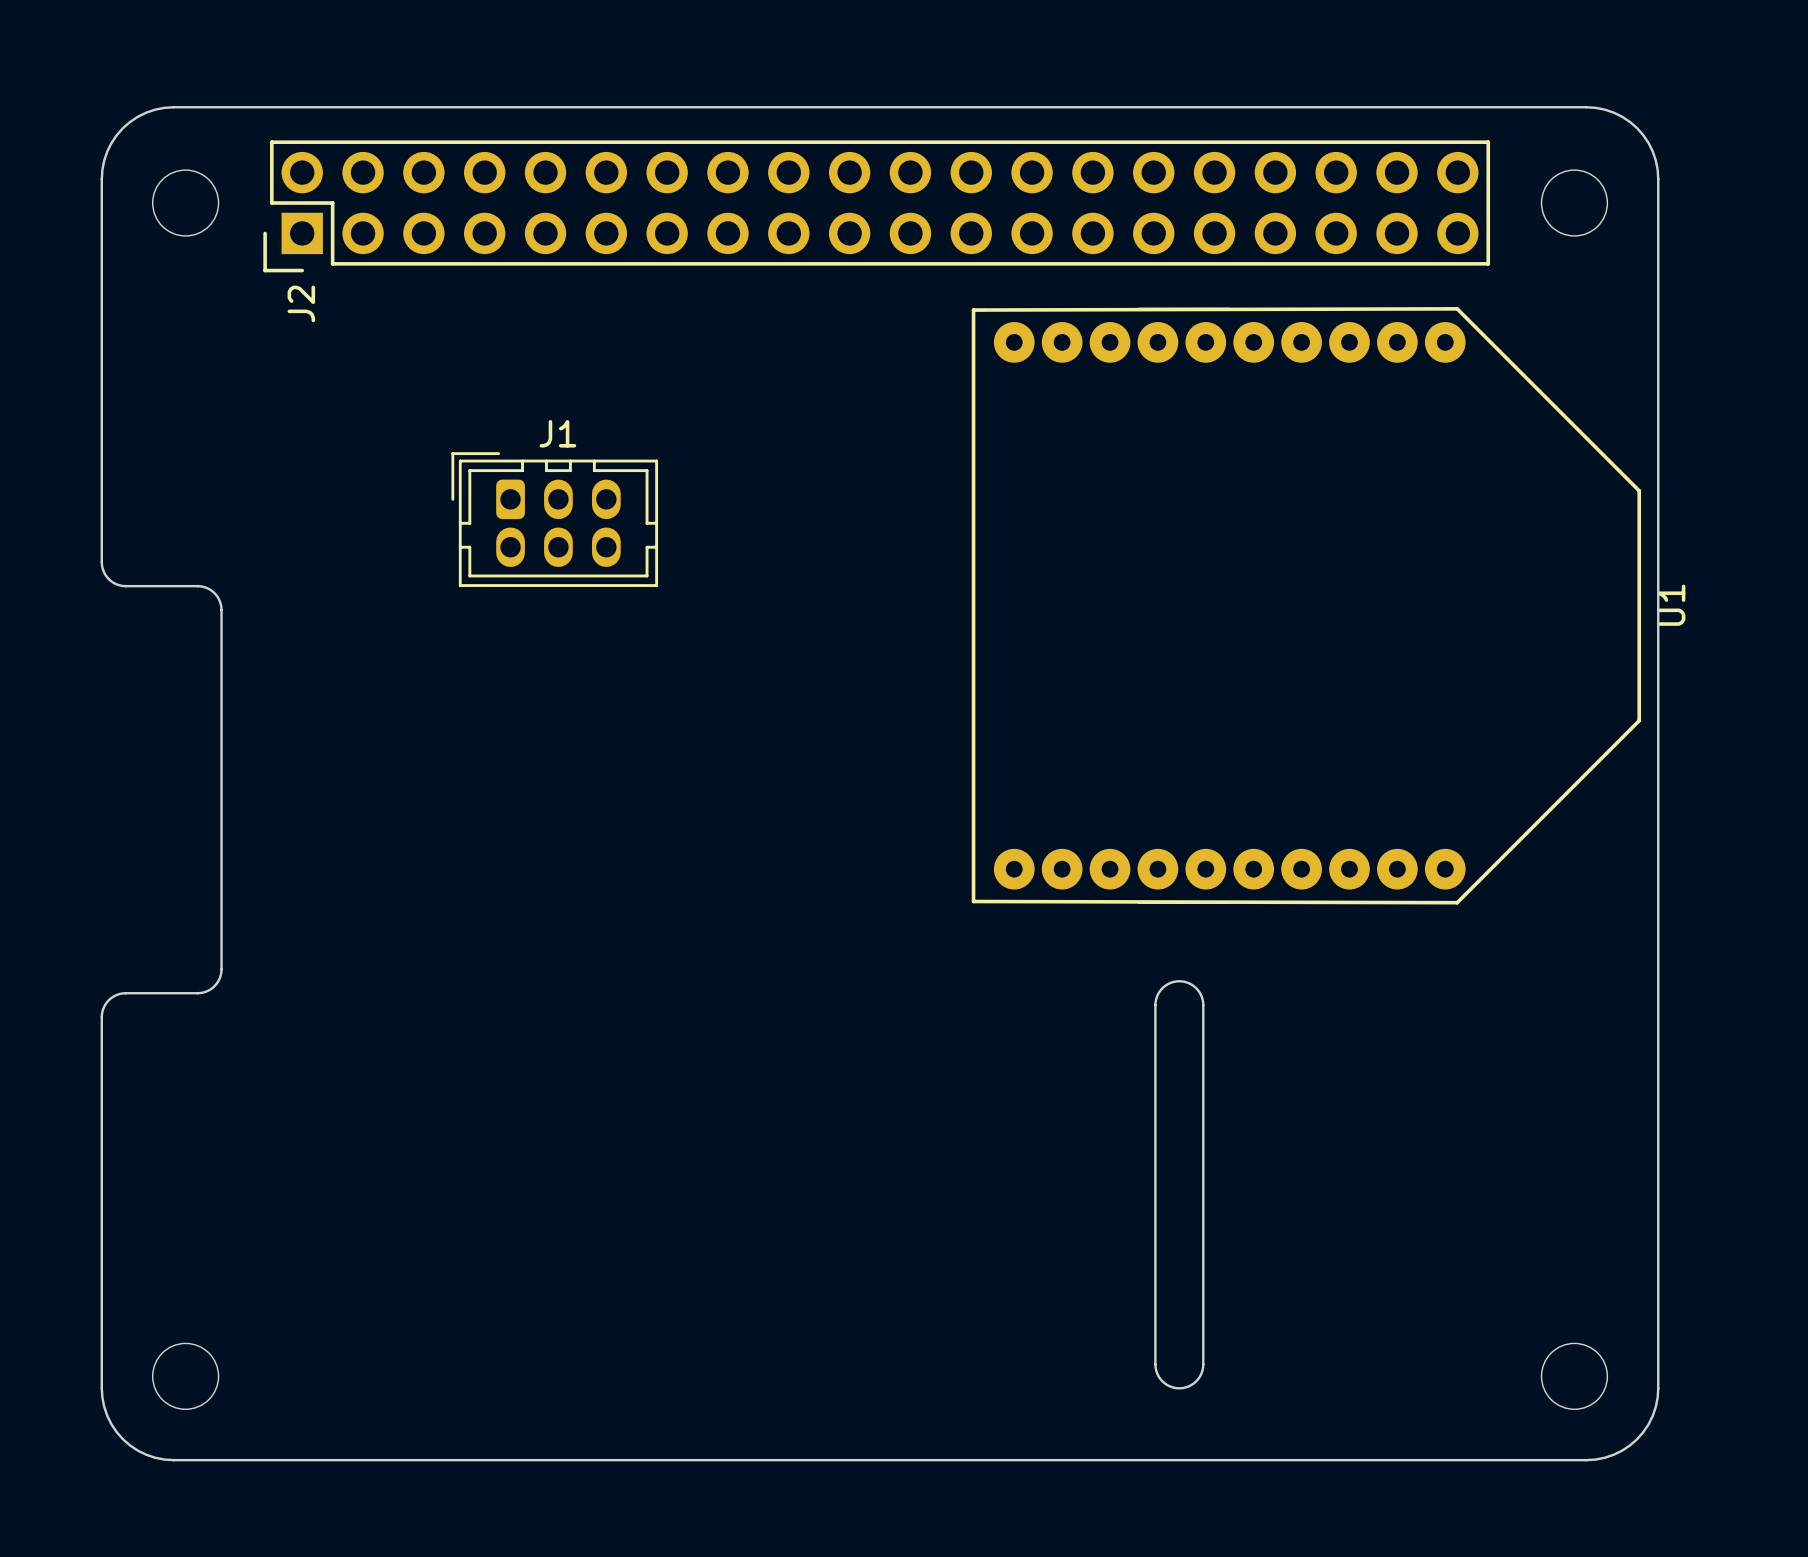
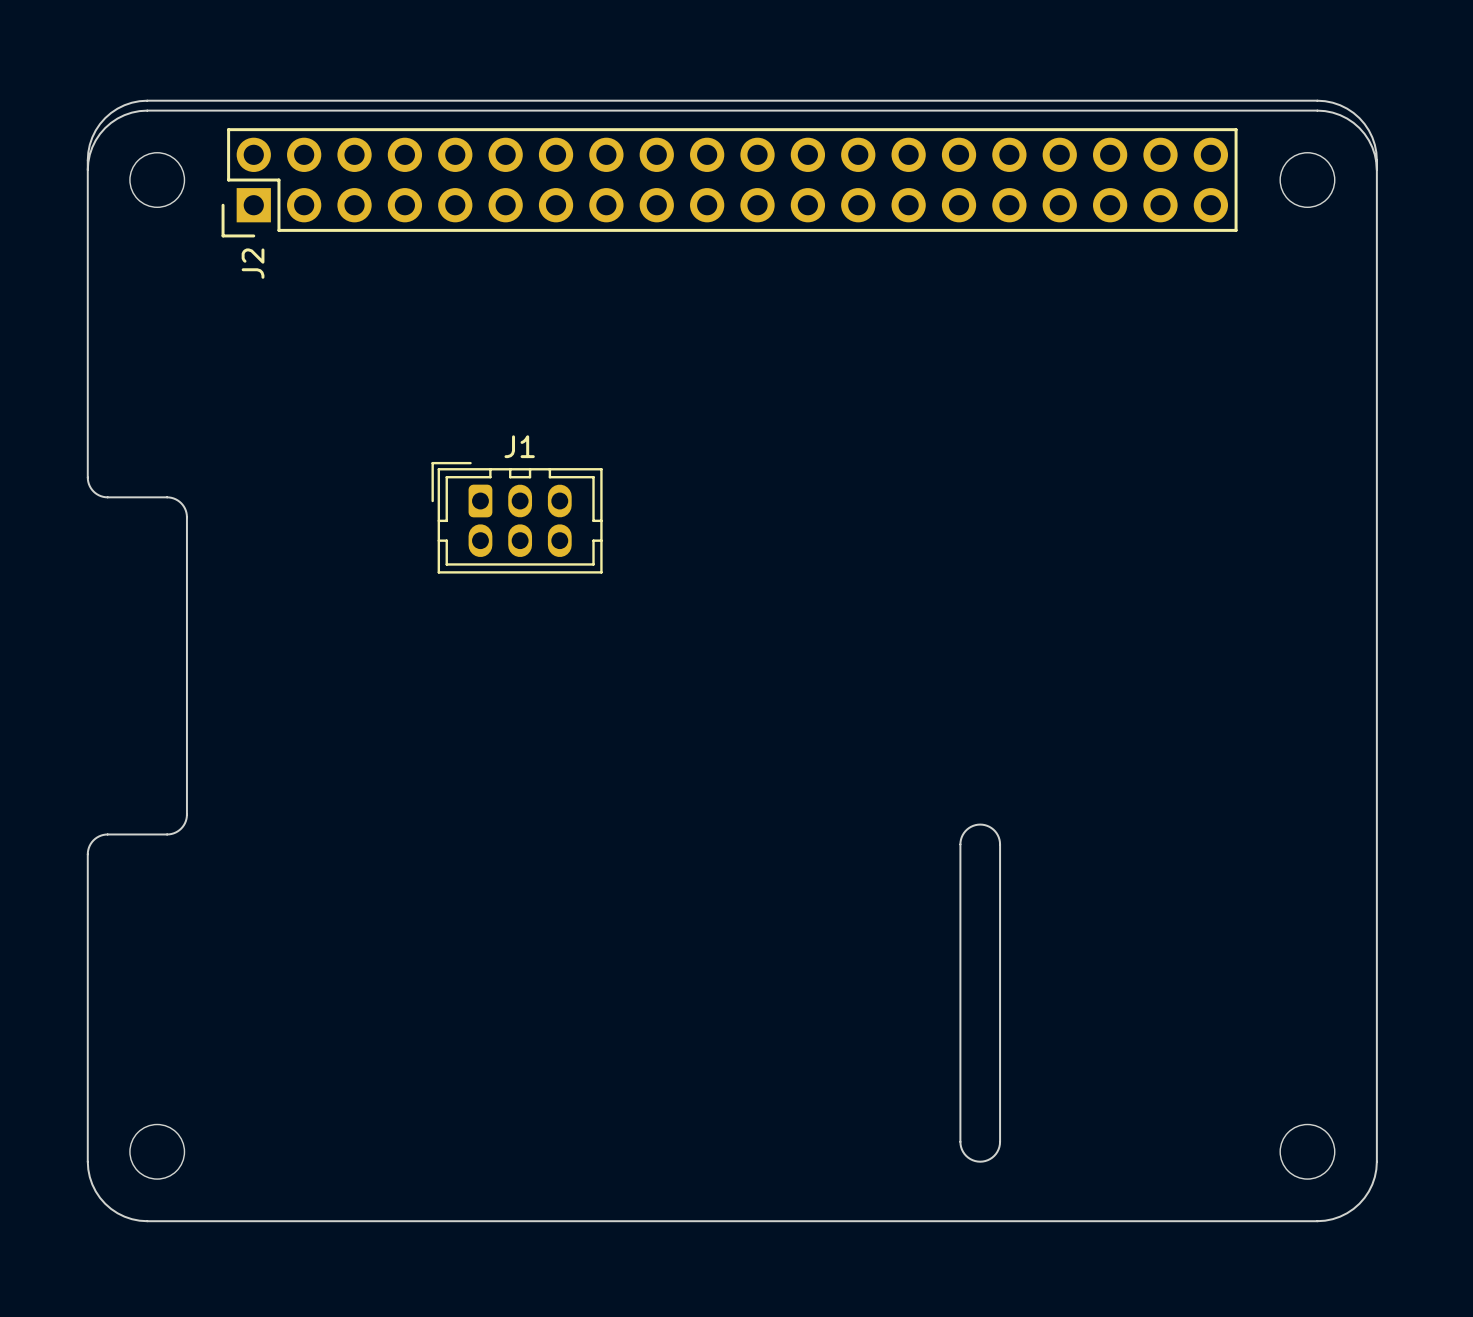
board edge: none -> (87, 170) (92, 147) (105, 128) (124, 115) (147, 110) (1317, 110) (1340, 115) (1359, 128) (1372, 147) (1376, 170)
line: (1457, 308) (973, 310) (973, 901) (1457, 902) (1639, 720) (1639, 490) (1457, 308) -> none
J1 position: (554, 519) -> (517, 517)
U1: (1306, 605) -> none

